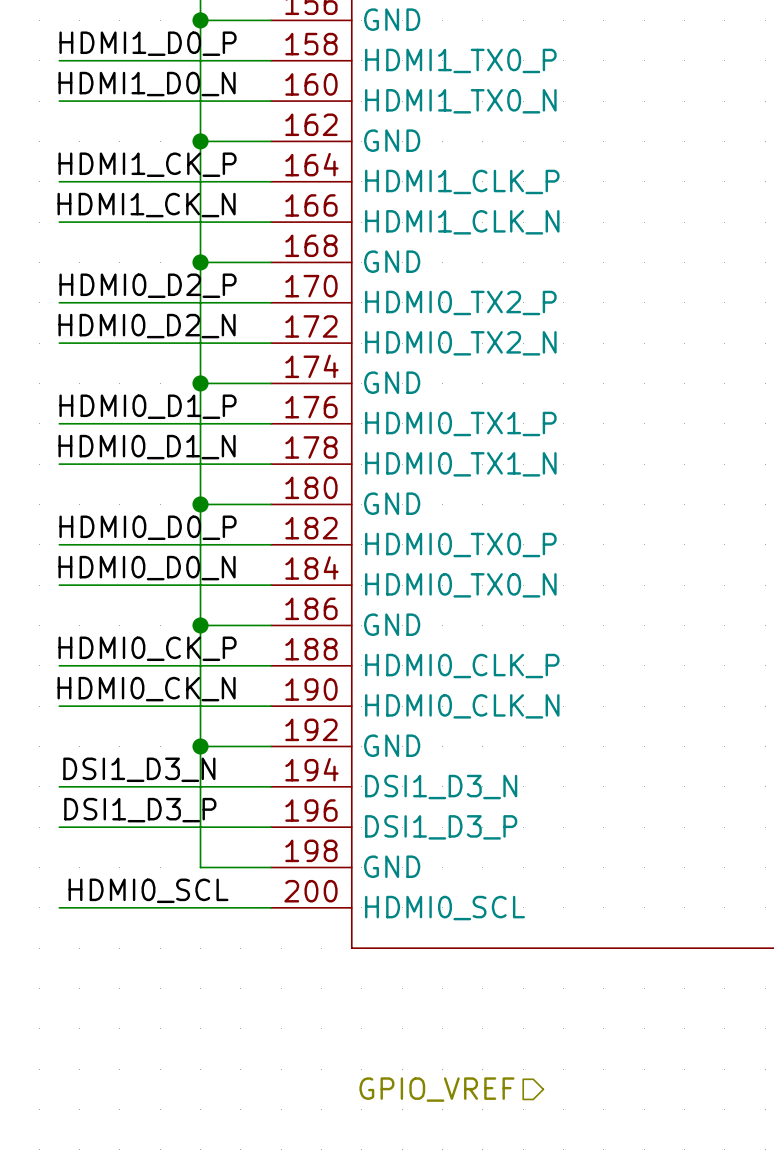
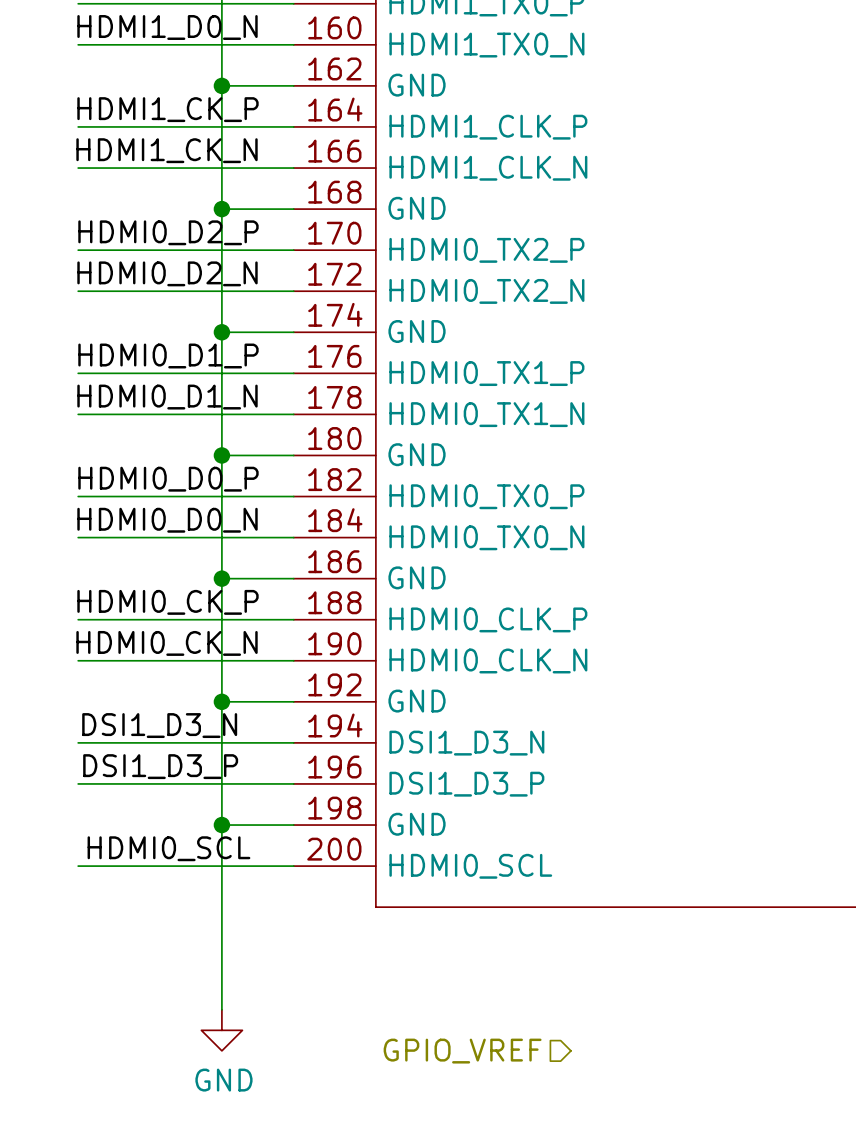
wire: none -> (221, 825) (221, 1009)
junction: none -> (221, 825)
power symbol: none -> GND (221, 1030)

